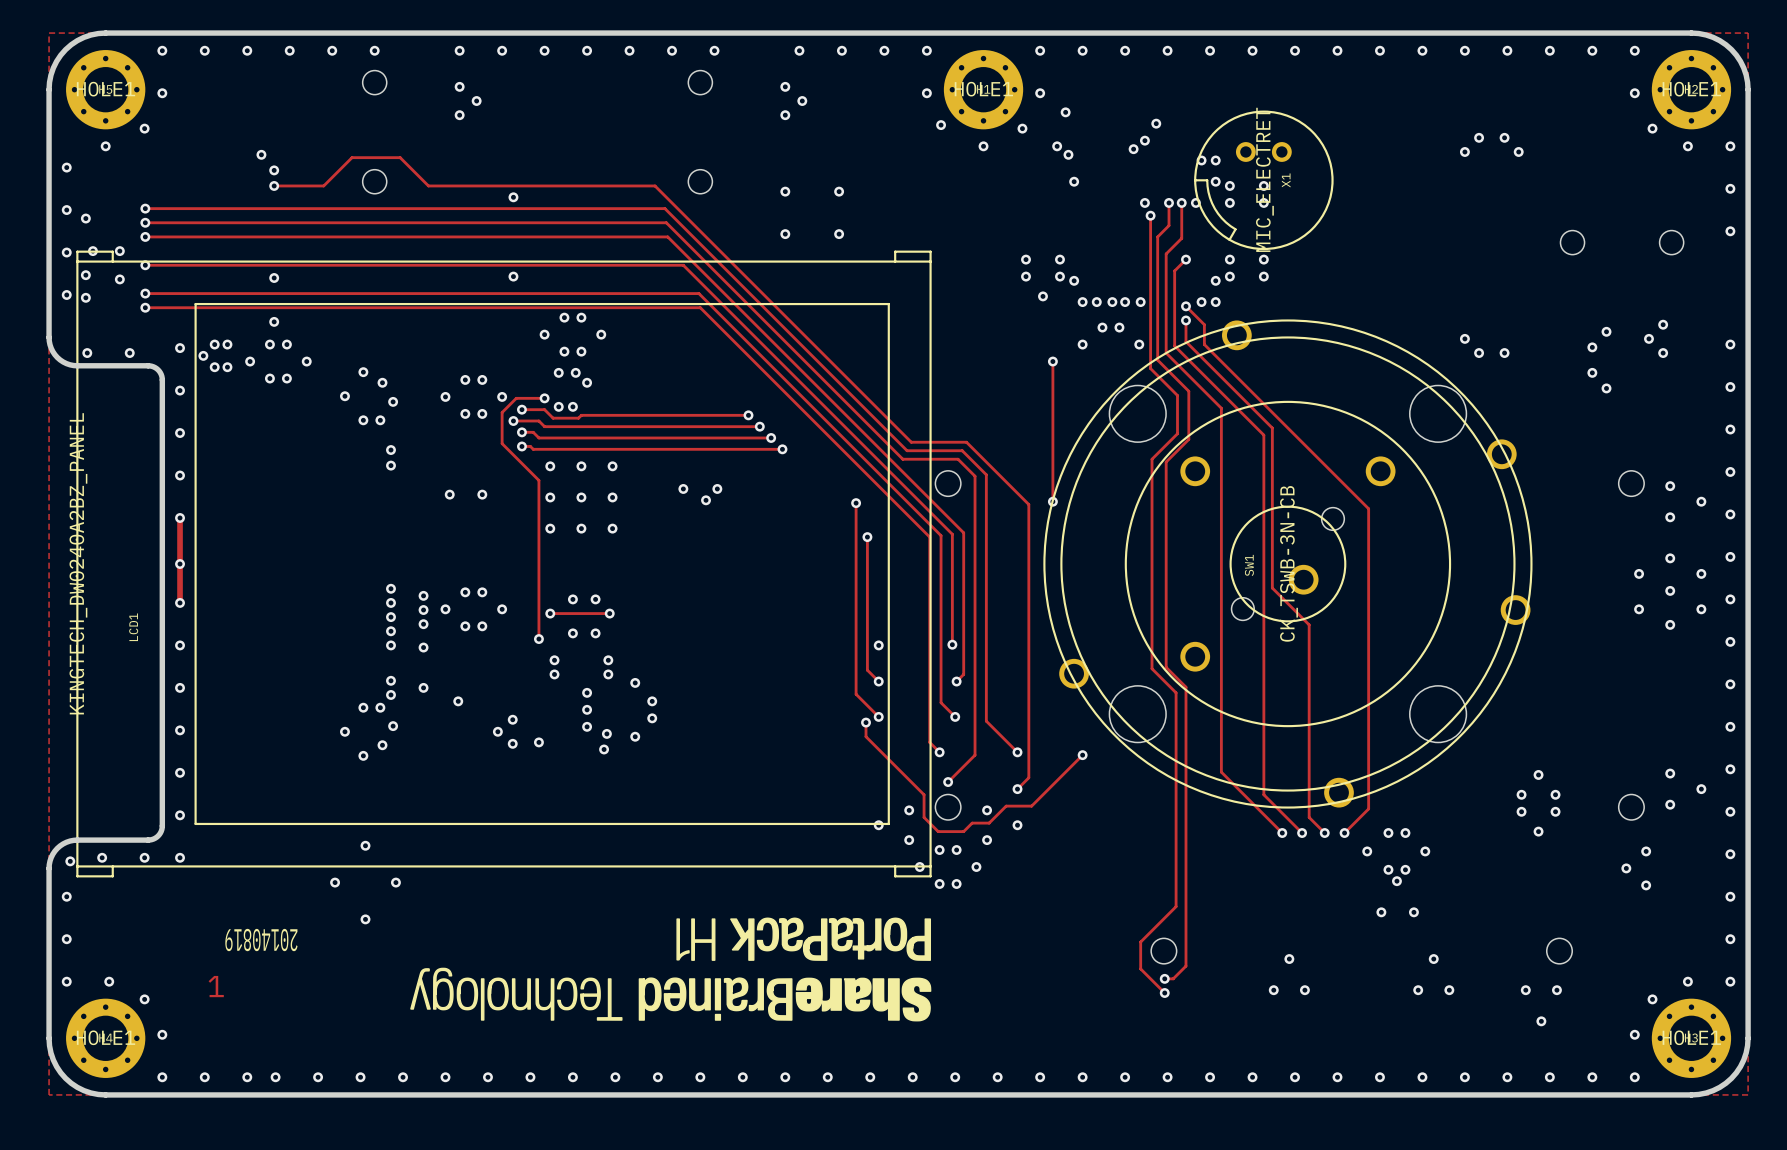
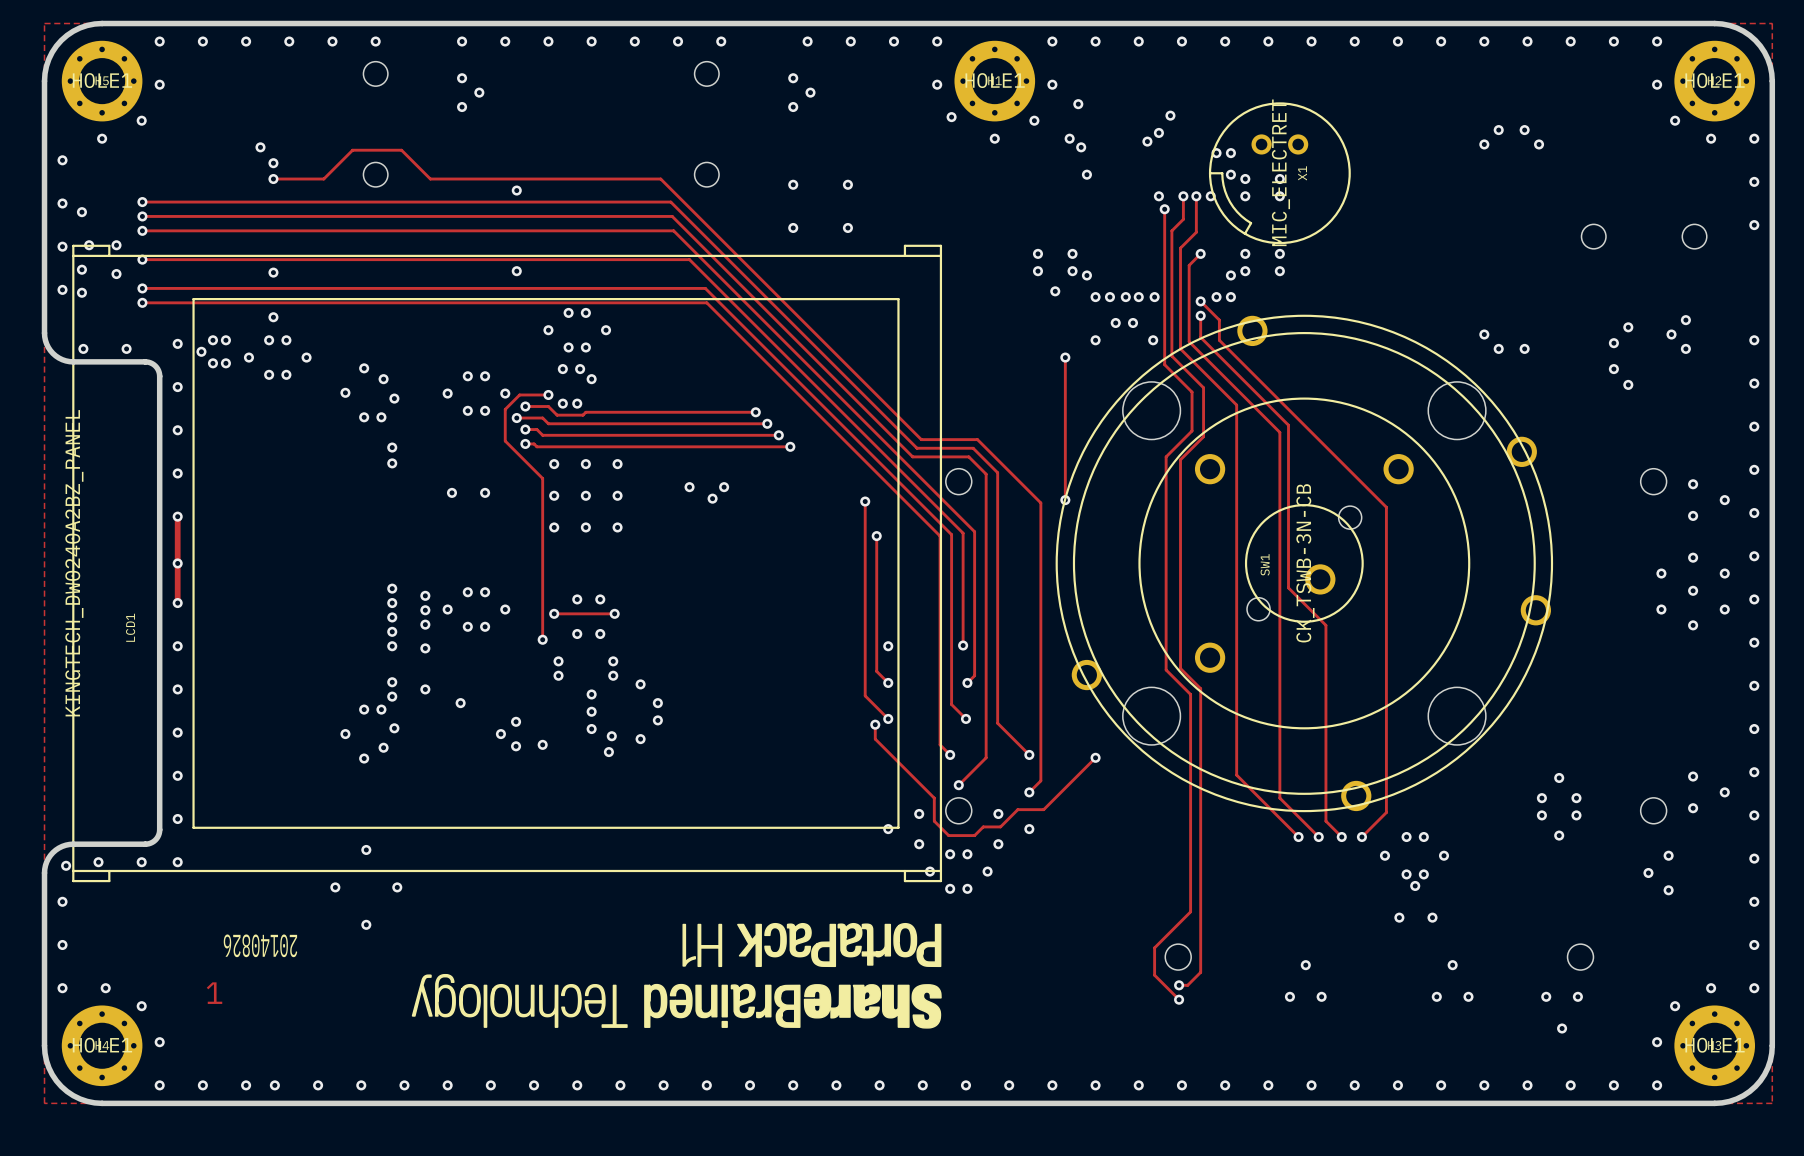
text: 20140819 (261, 940) -> 20140826 (260, 945)

